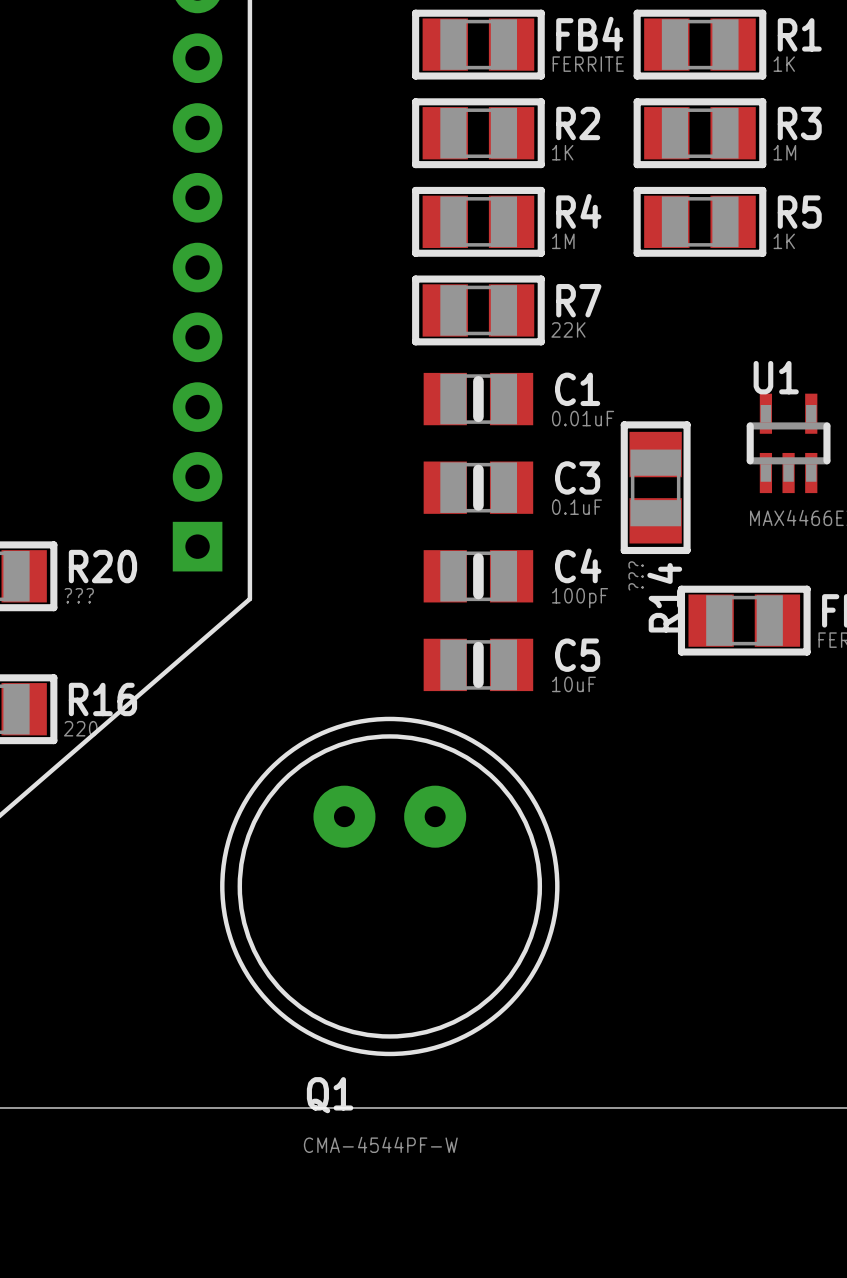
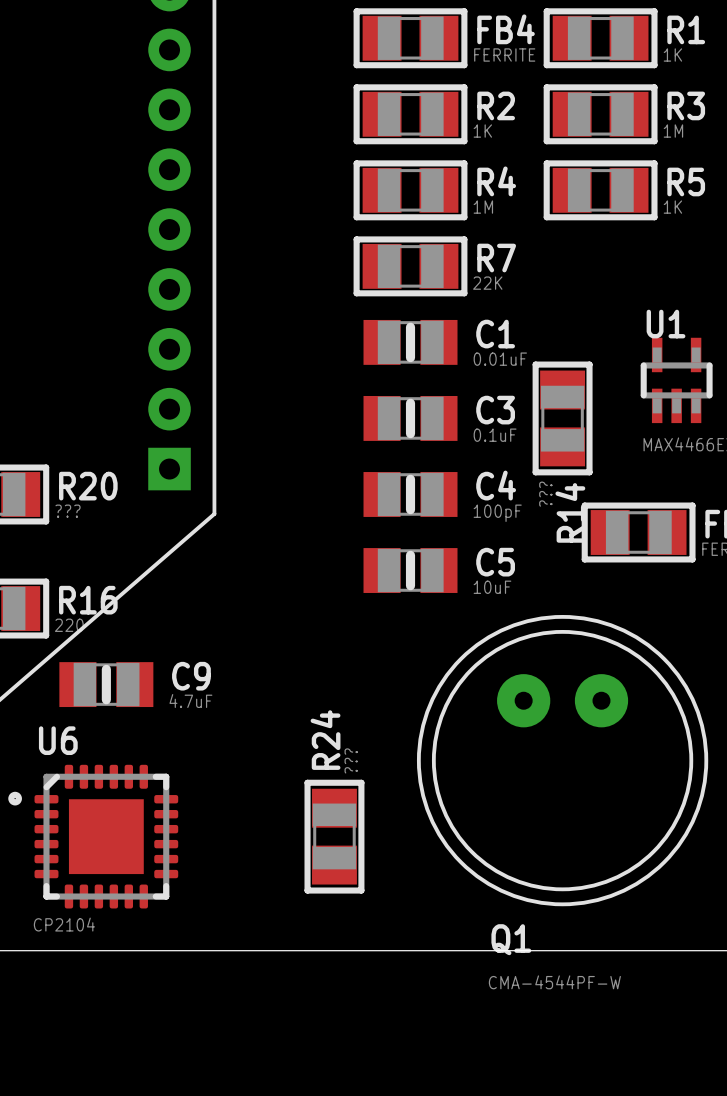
C9: none -> 4.7uF (106, 684)
Q1 position: (389, 886) -> (562, 760)
U6: none -> CP2104 (93, 836)
R24: none -> ??? (334, 836)

